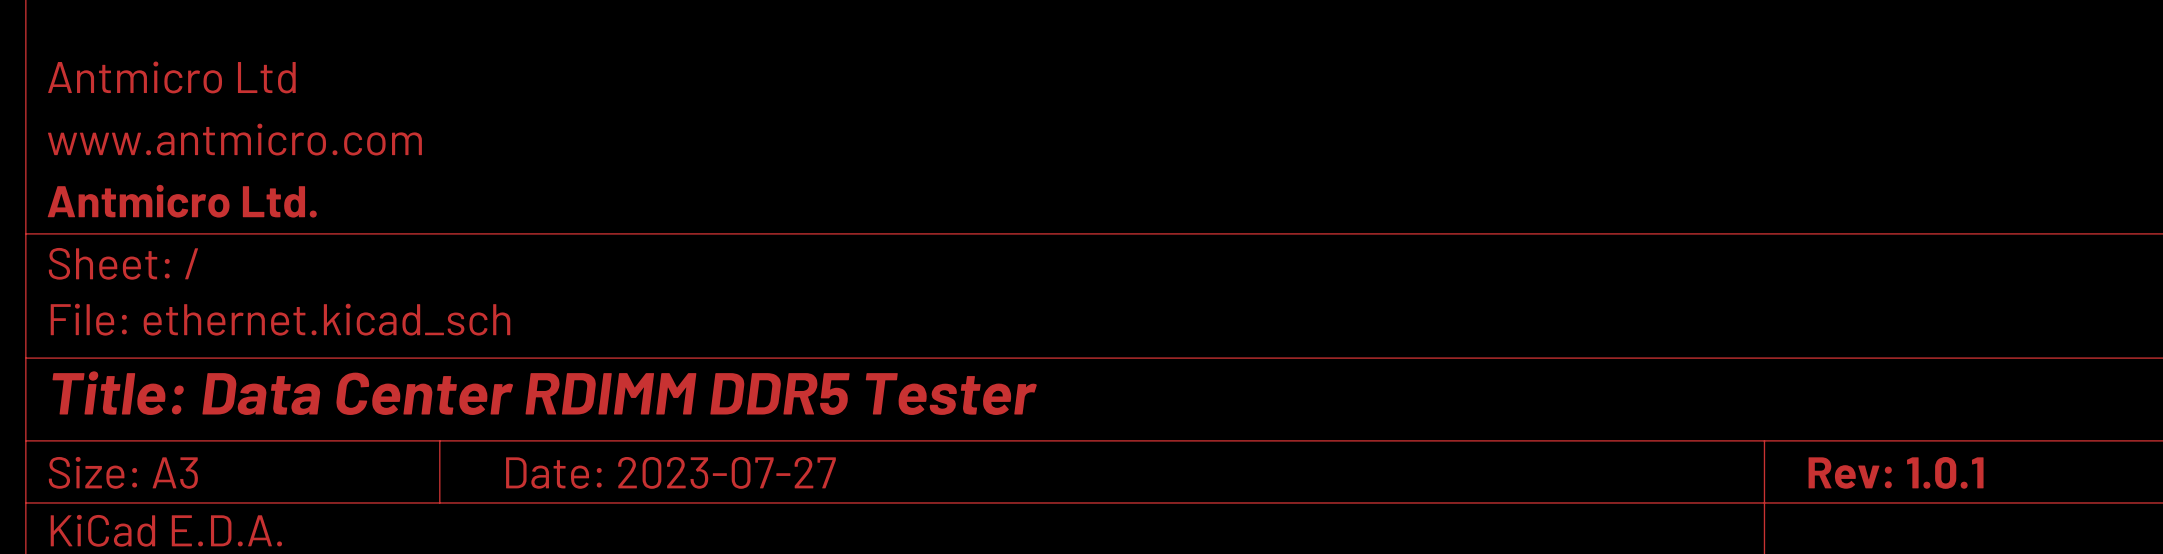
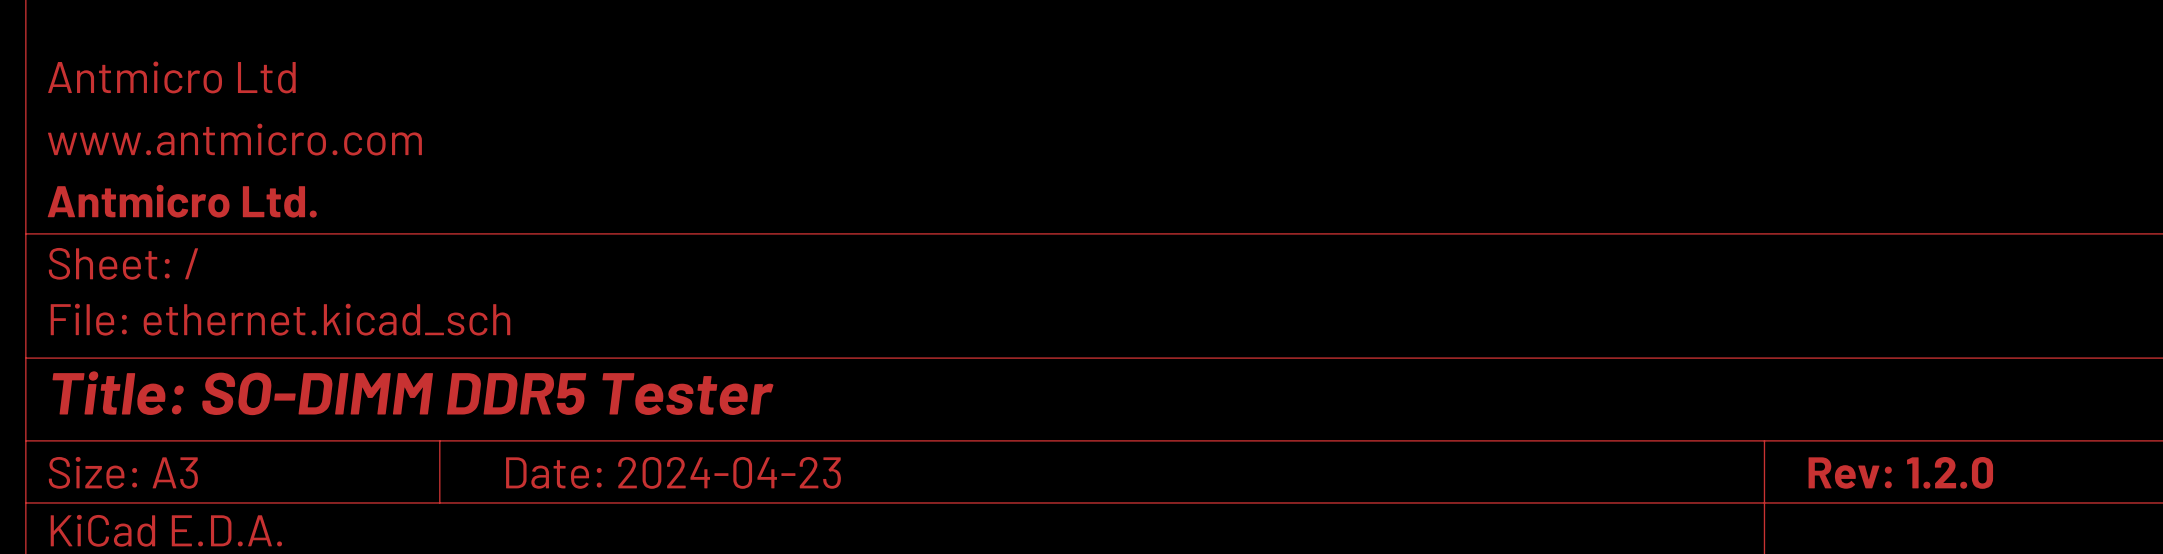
title block: Title: Data Center RDIMM DDR5 Tester (544, 393) -> Title: SO-DIMM DDR5 Tester (413, 393)
title block: Date: 2023-07-27 (670, 472) -> Date: 2024-04-23 (673, 472)
title block: Rev: 1.0.1 (1896, 472) -> Rev: 1.2.0 (1900, 472)

